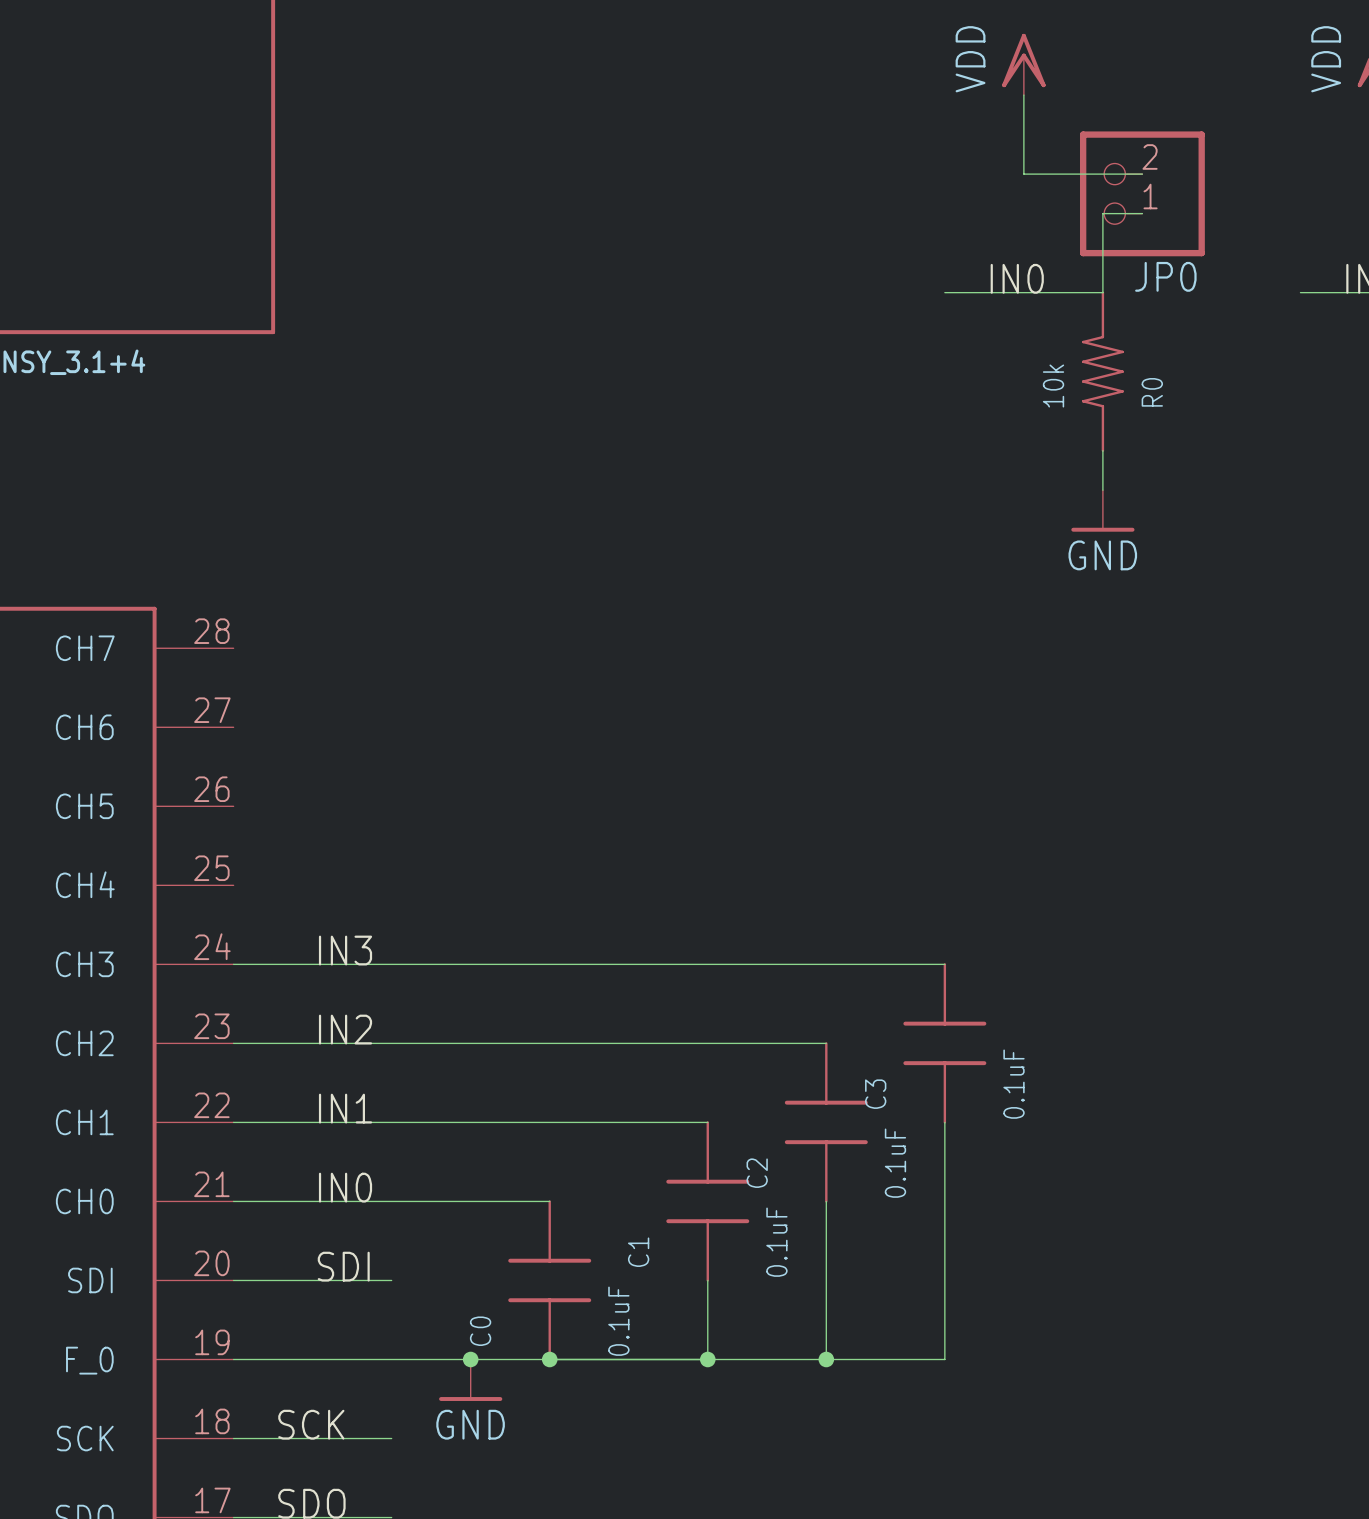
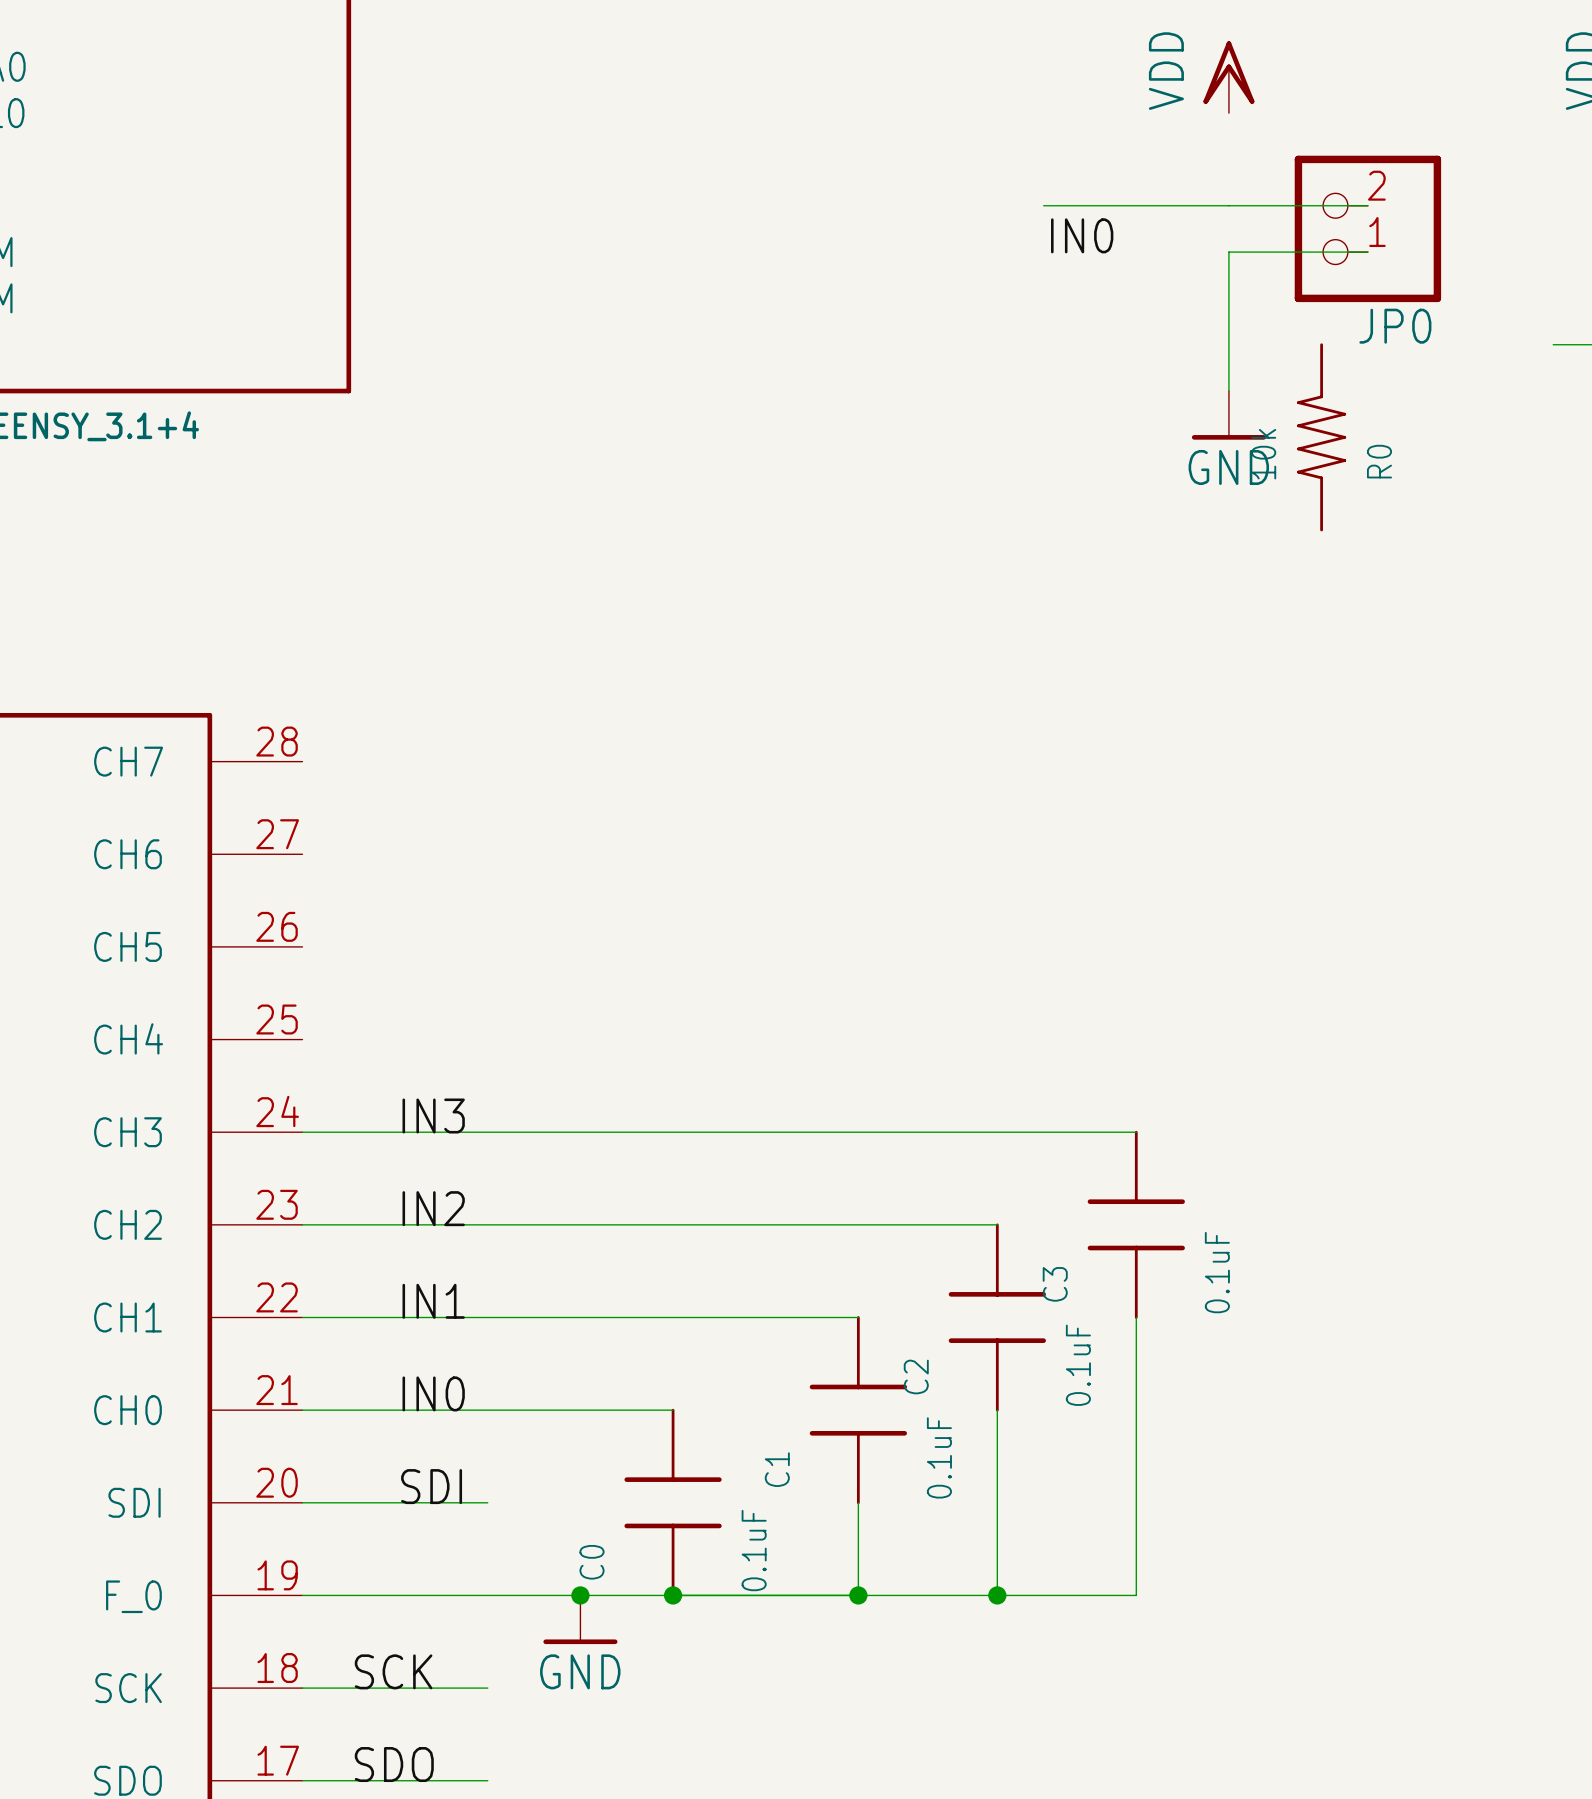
wire: (1023, 95) (1023, 174) -> (1043, 205) (1228, 205)
wire: (1102, 213) (1102, 292) (944, 292) -> (1321, 252) (1228, 252) (1228, 391)
label position: IN0 (1017, 278) -> IN0 (1082, 235)
wire: (1102, 450) (1102, 490) -> none
power symbol position: GND (1102, 510) -> GND (1228, 415)

